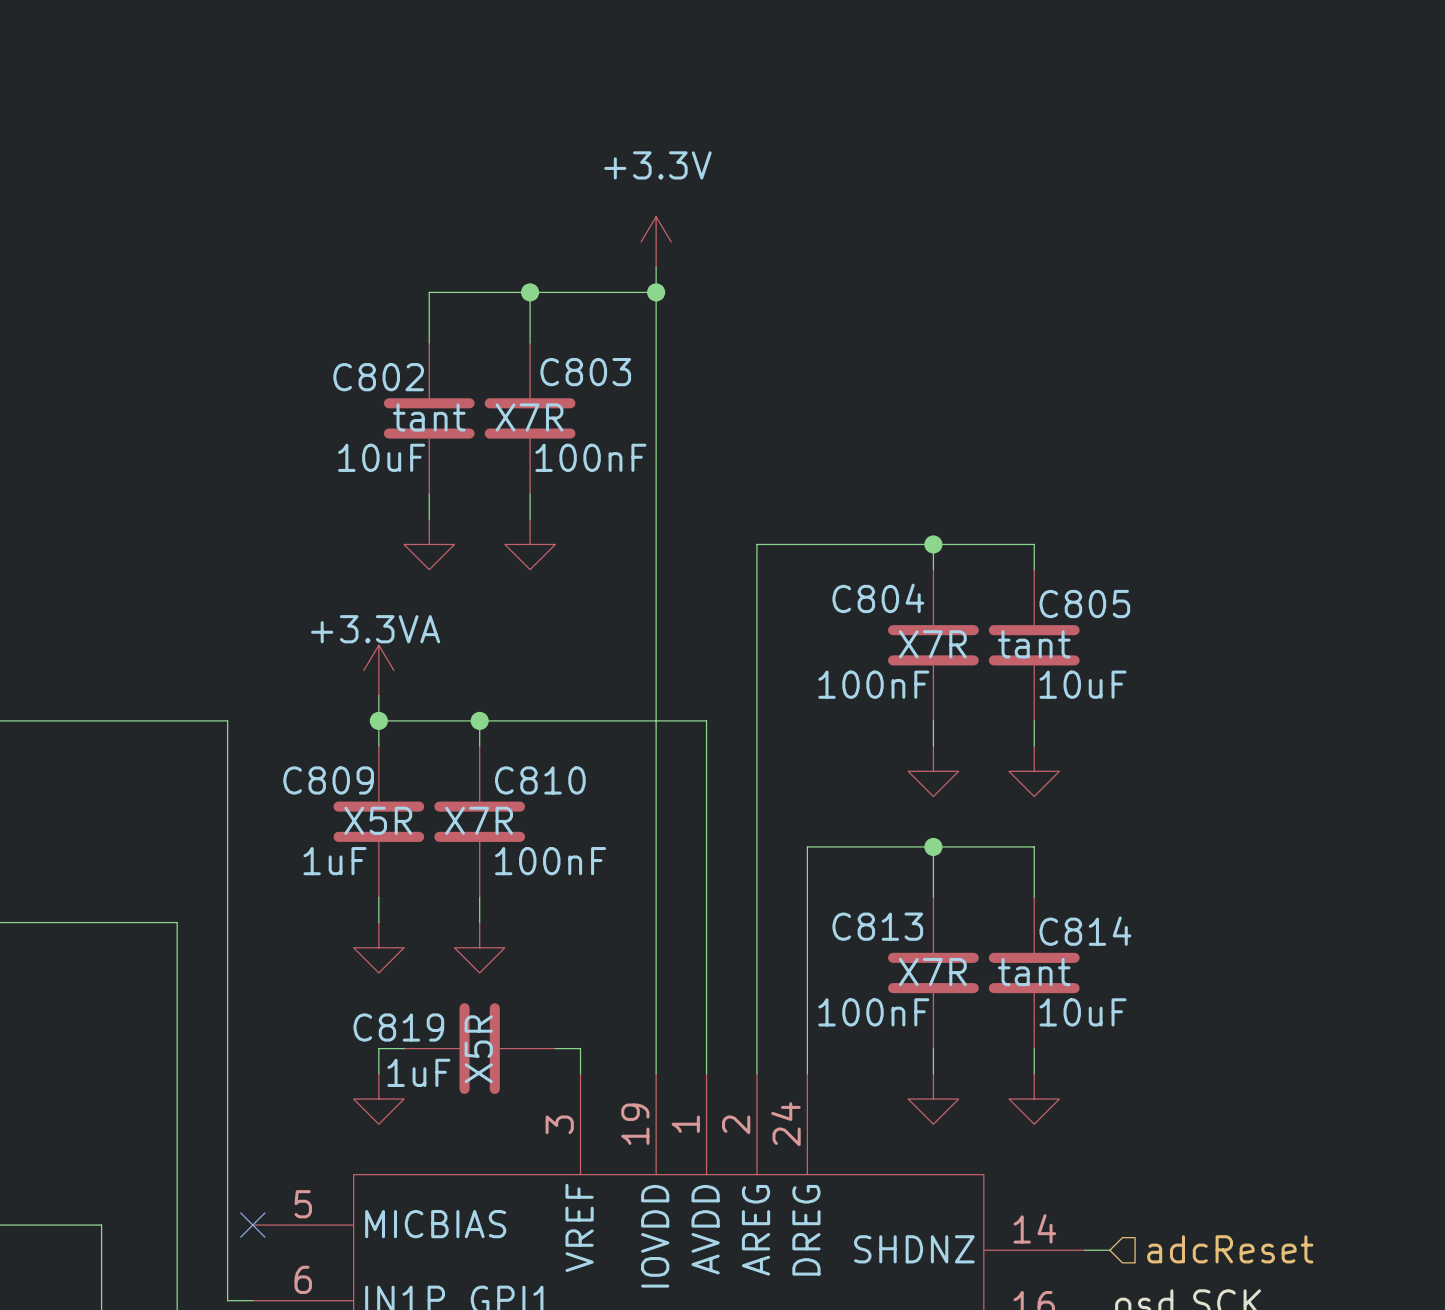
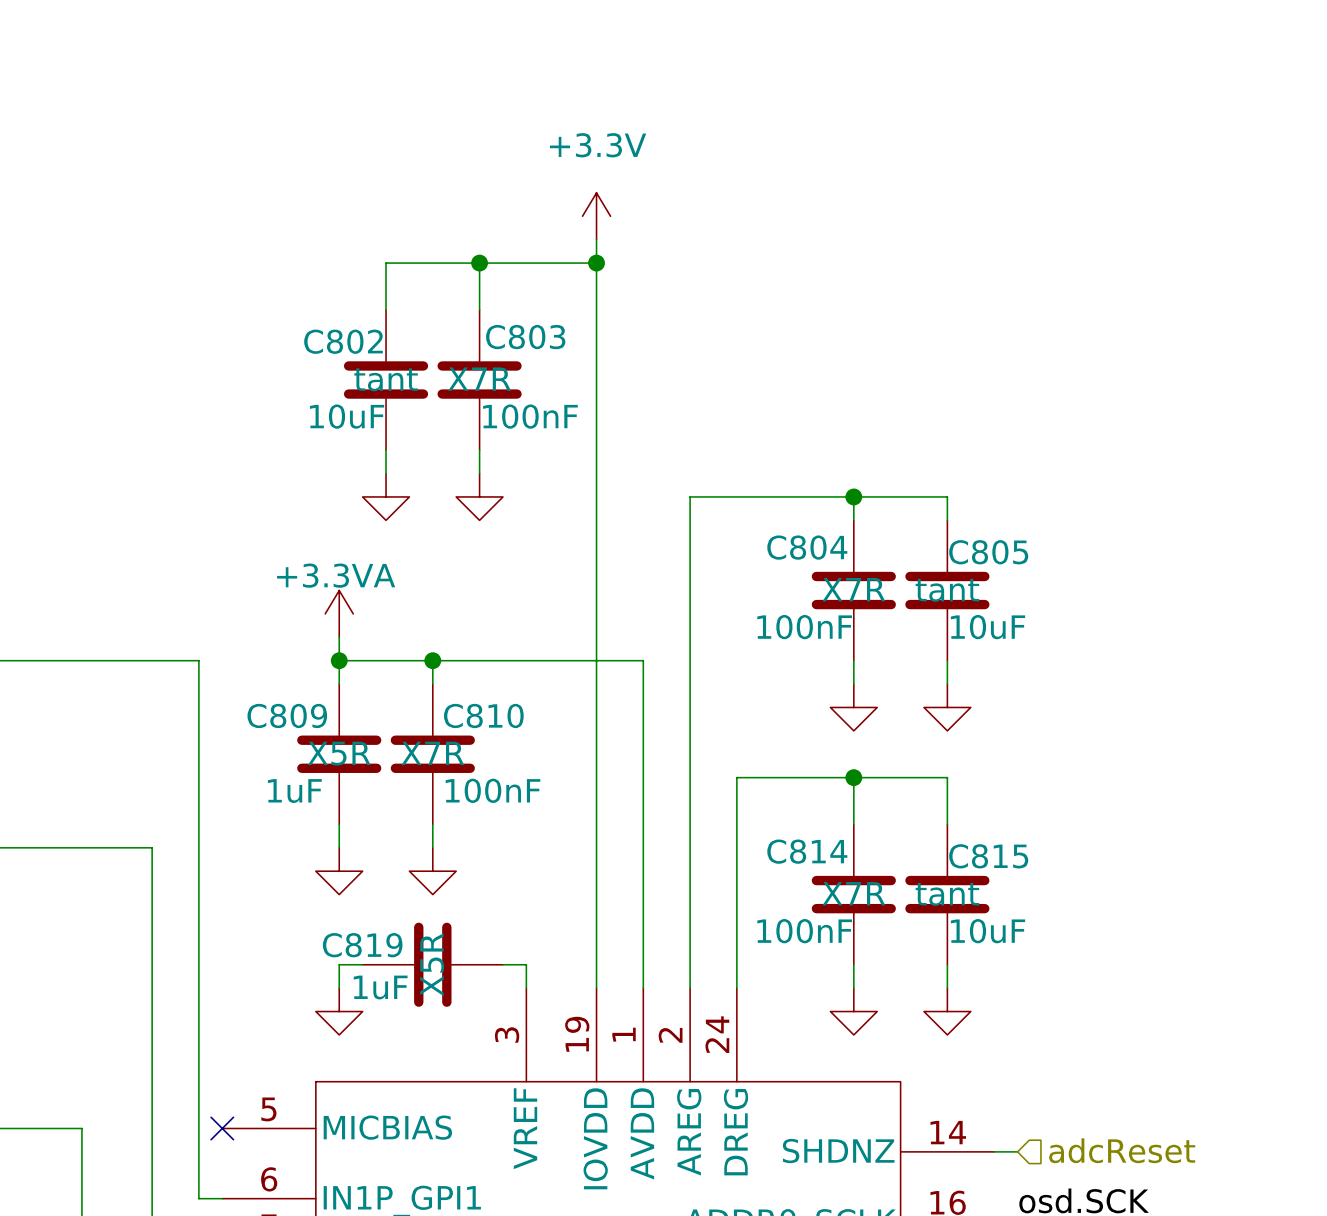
C813 name: C813 (877, 926) -> C814 (807, 851)
C814 name: C814 (1085, 931) -> C815 (988, 856)

